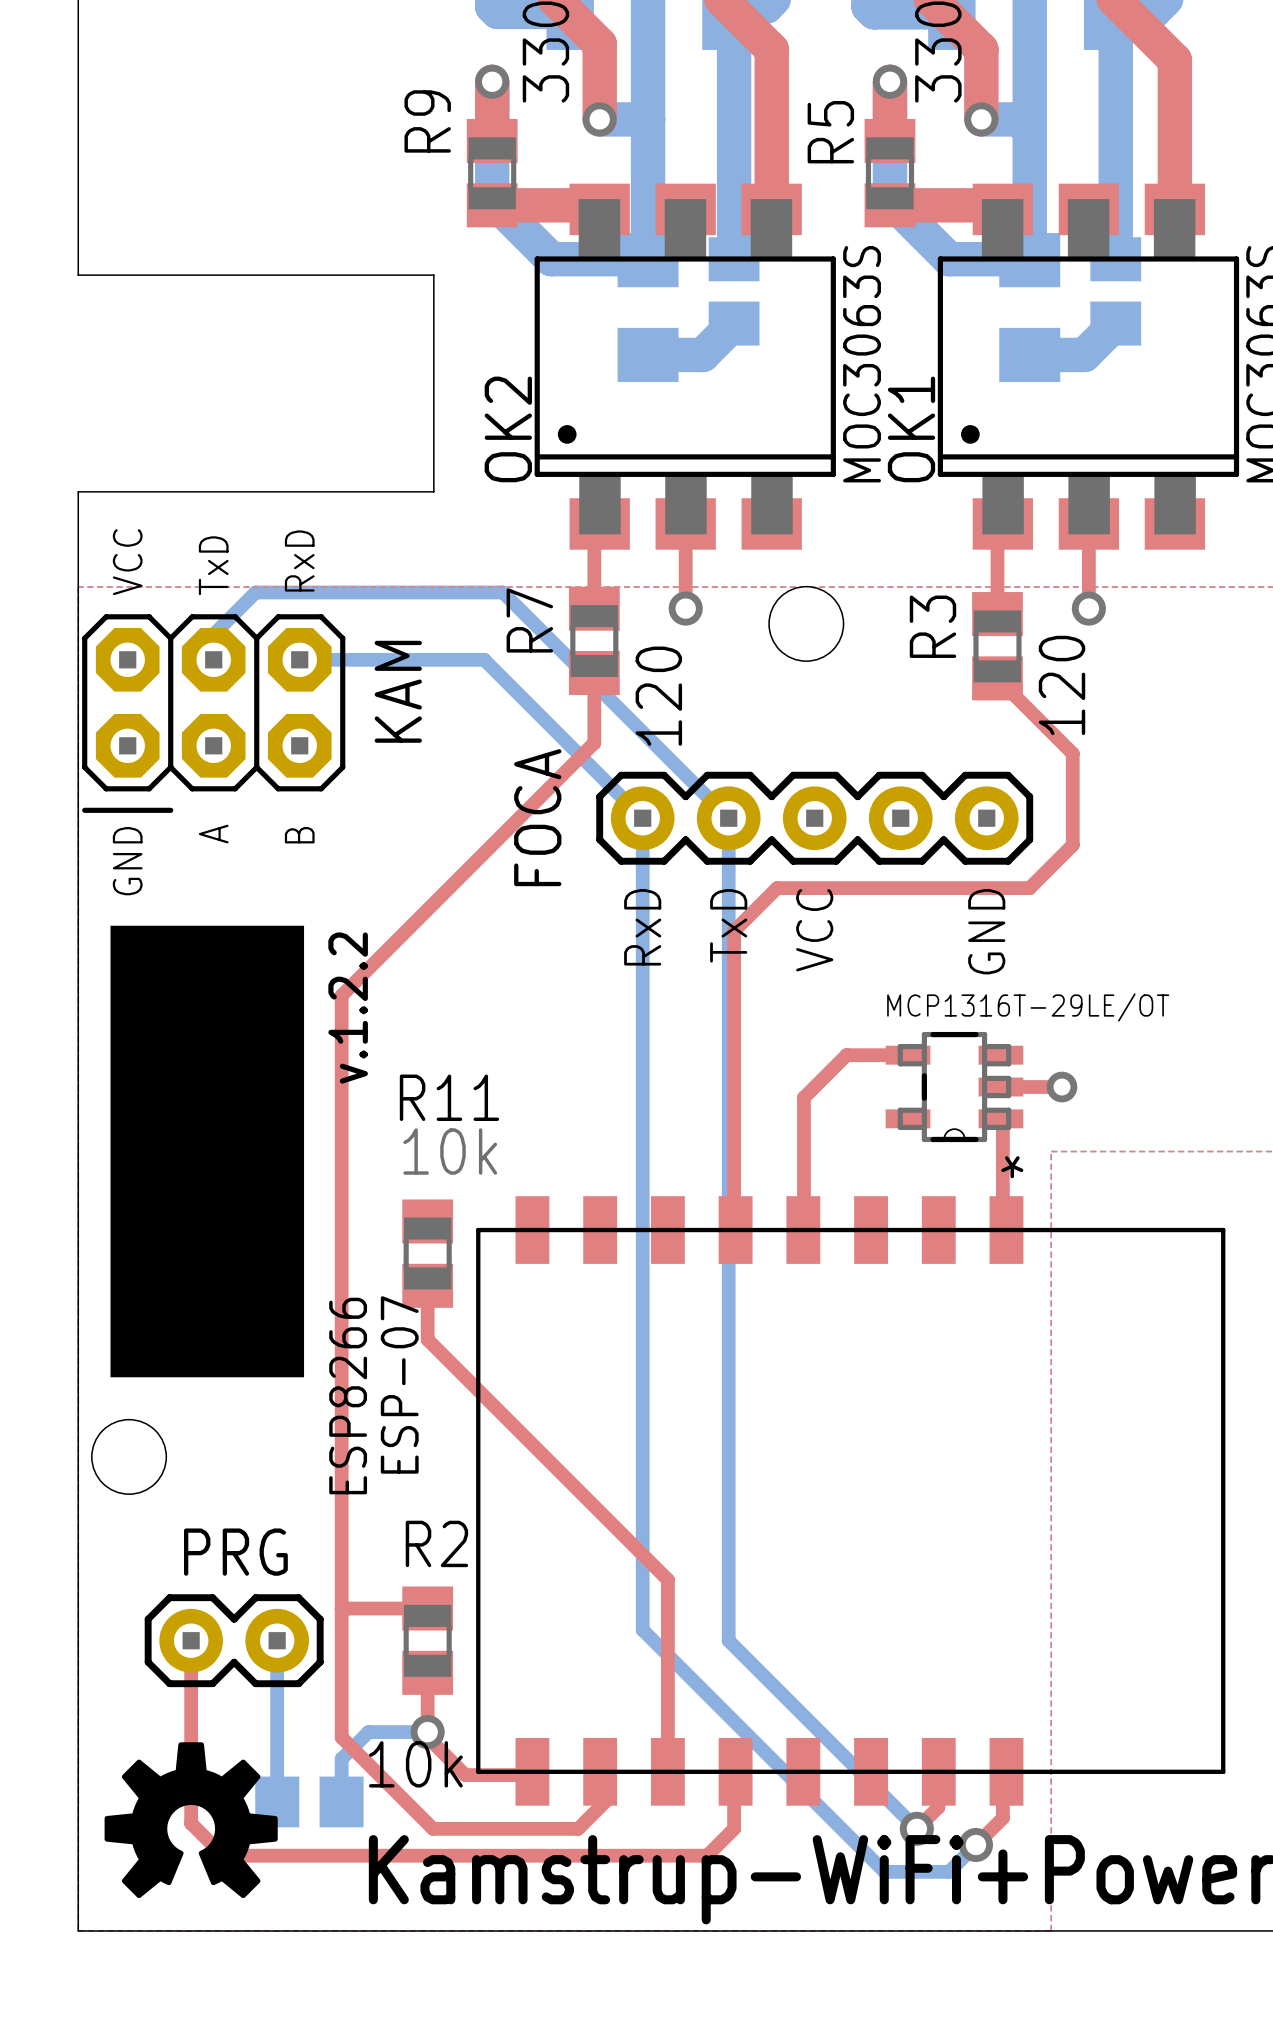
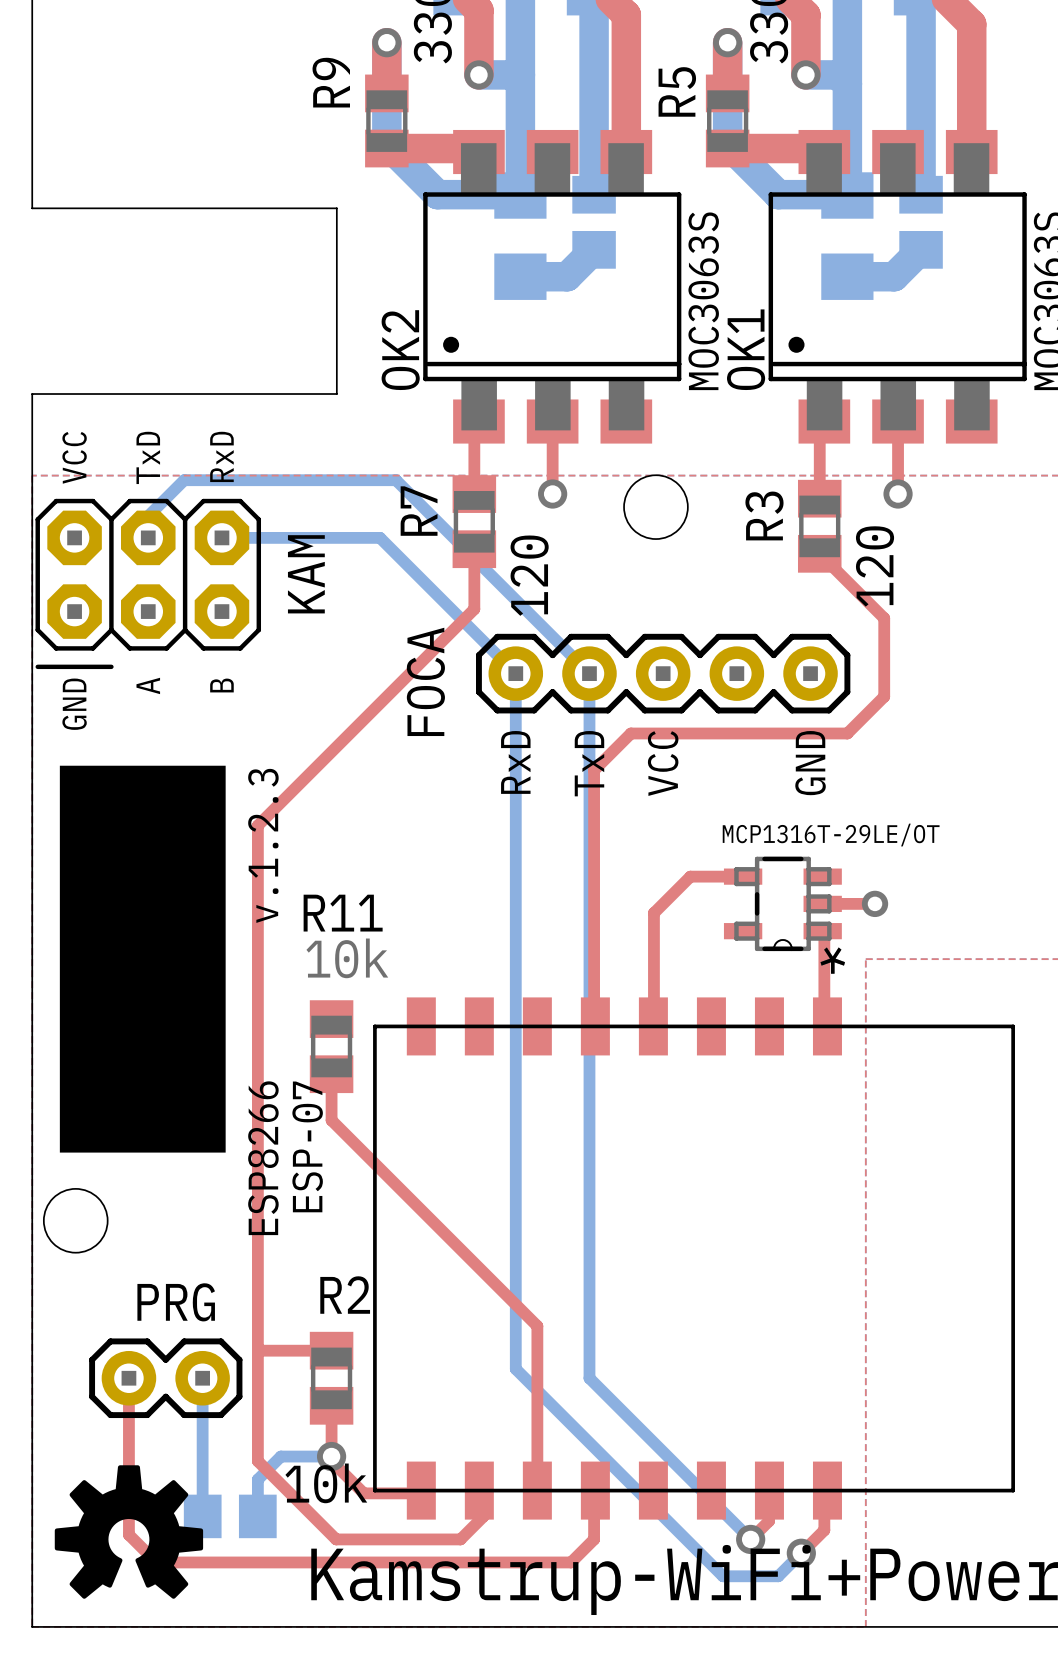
text: v.1.2.2 (348, 1008) -> v.1.2.3 (263, 845)

